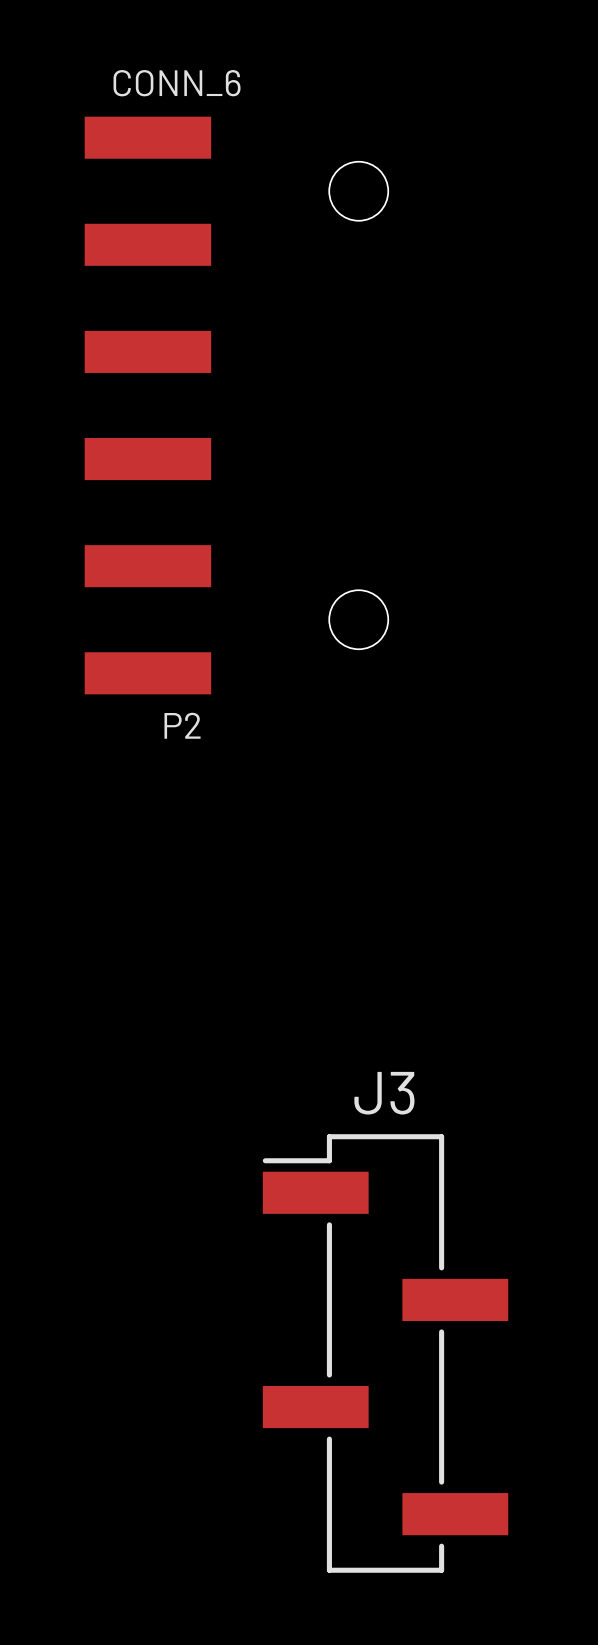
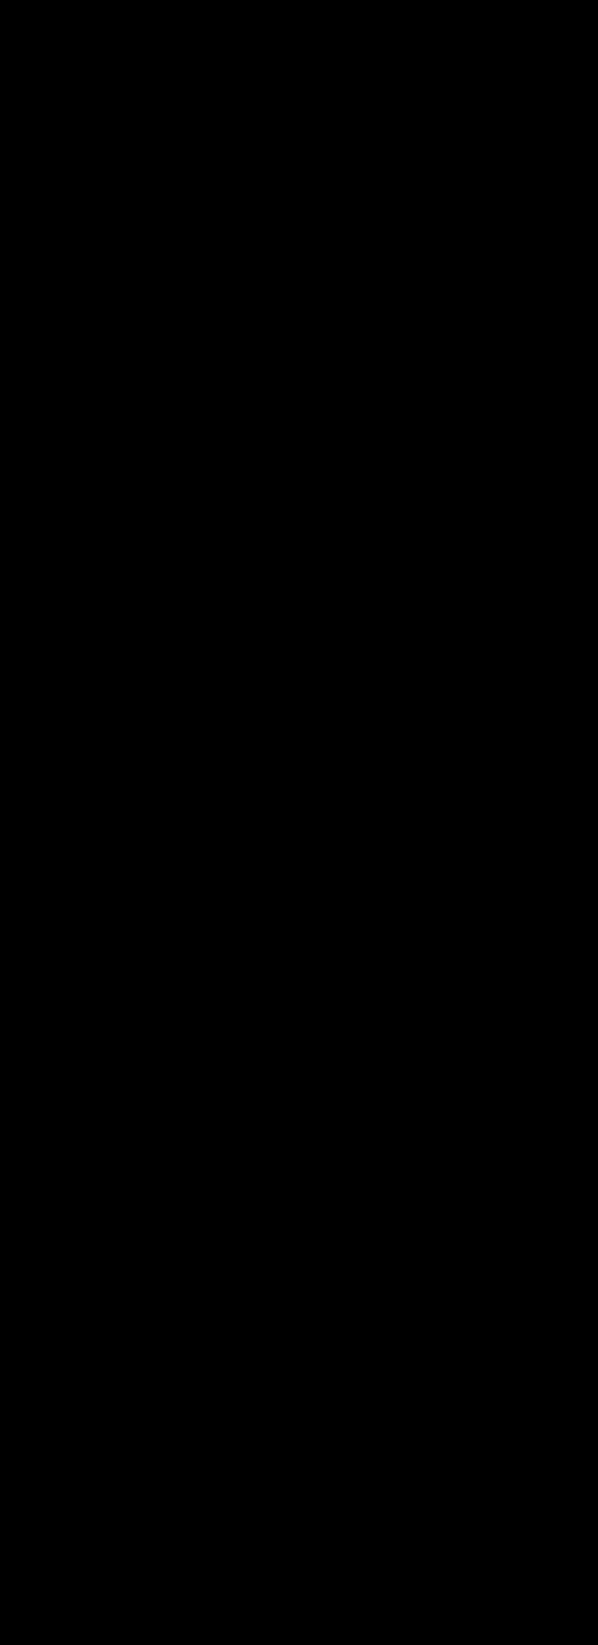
P2: CONN_6 (236, 405) -> none
J3: (385, 1353) -> none

